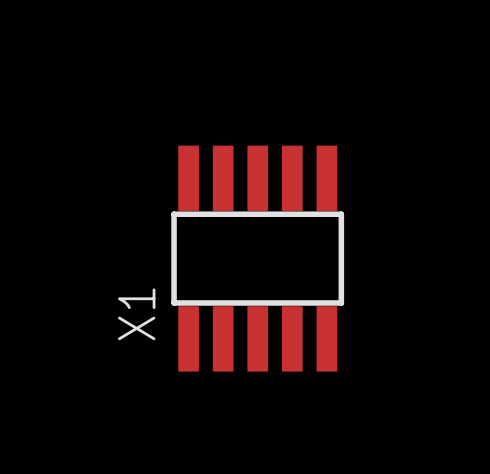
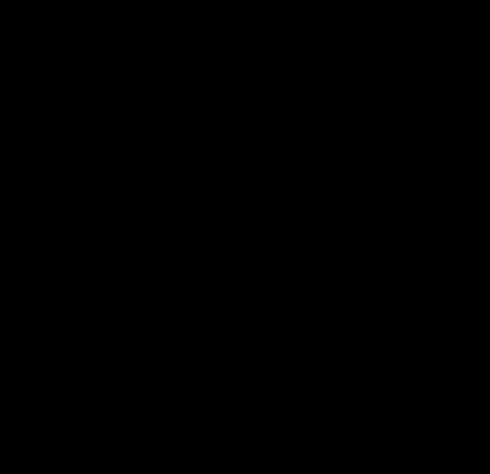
X1: (257, 258) -> none

